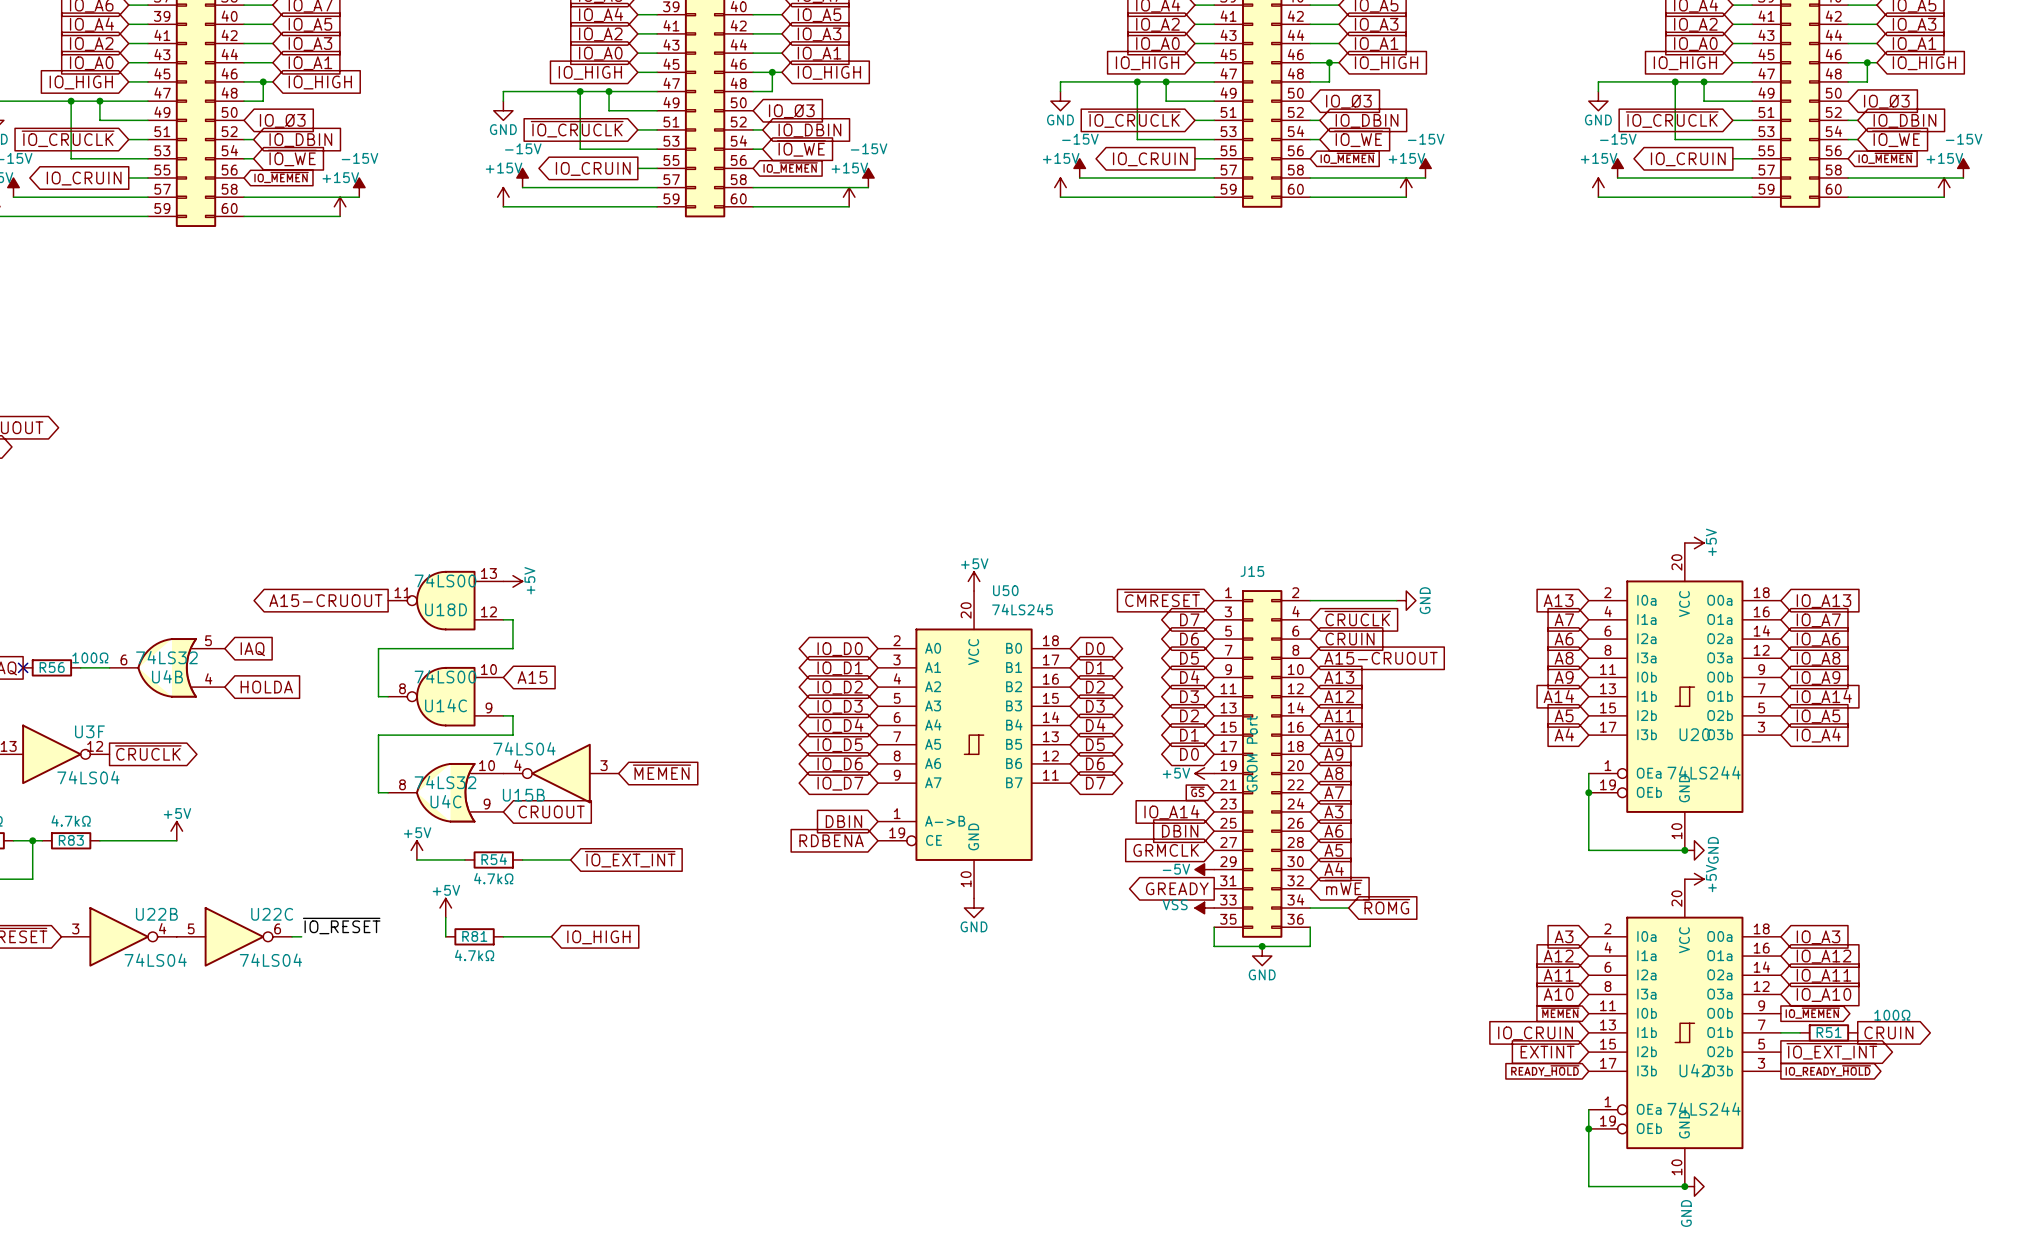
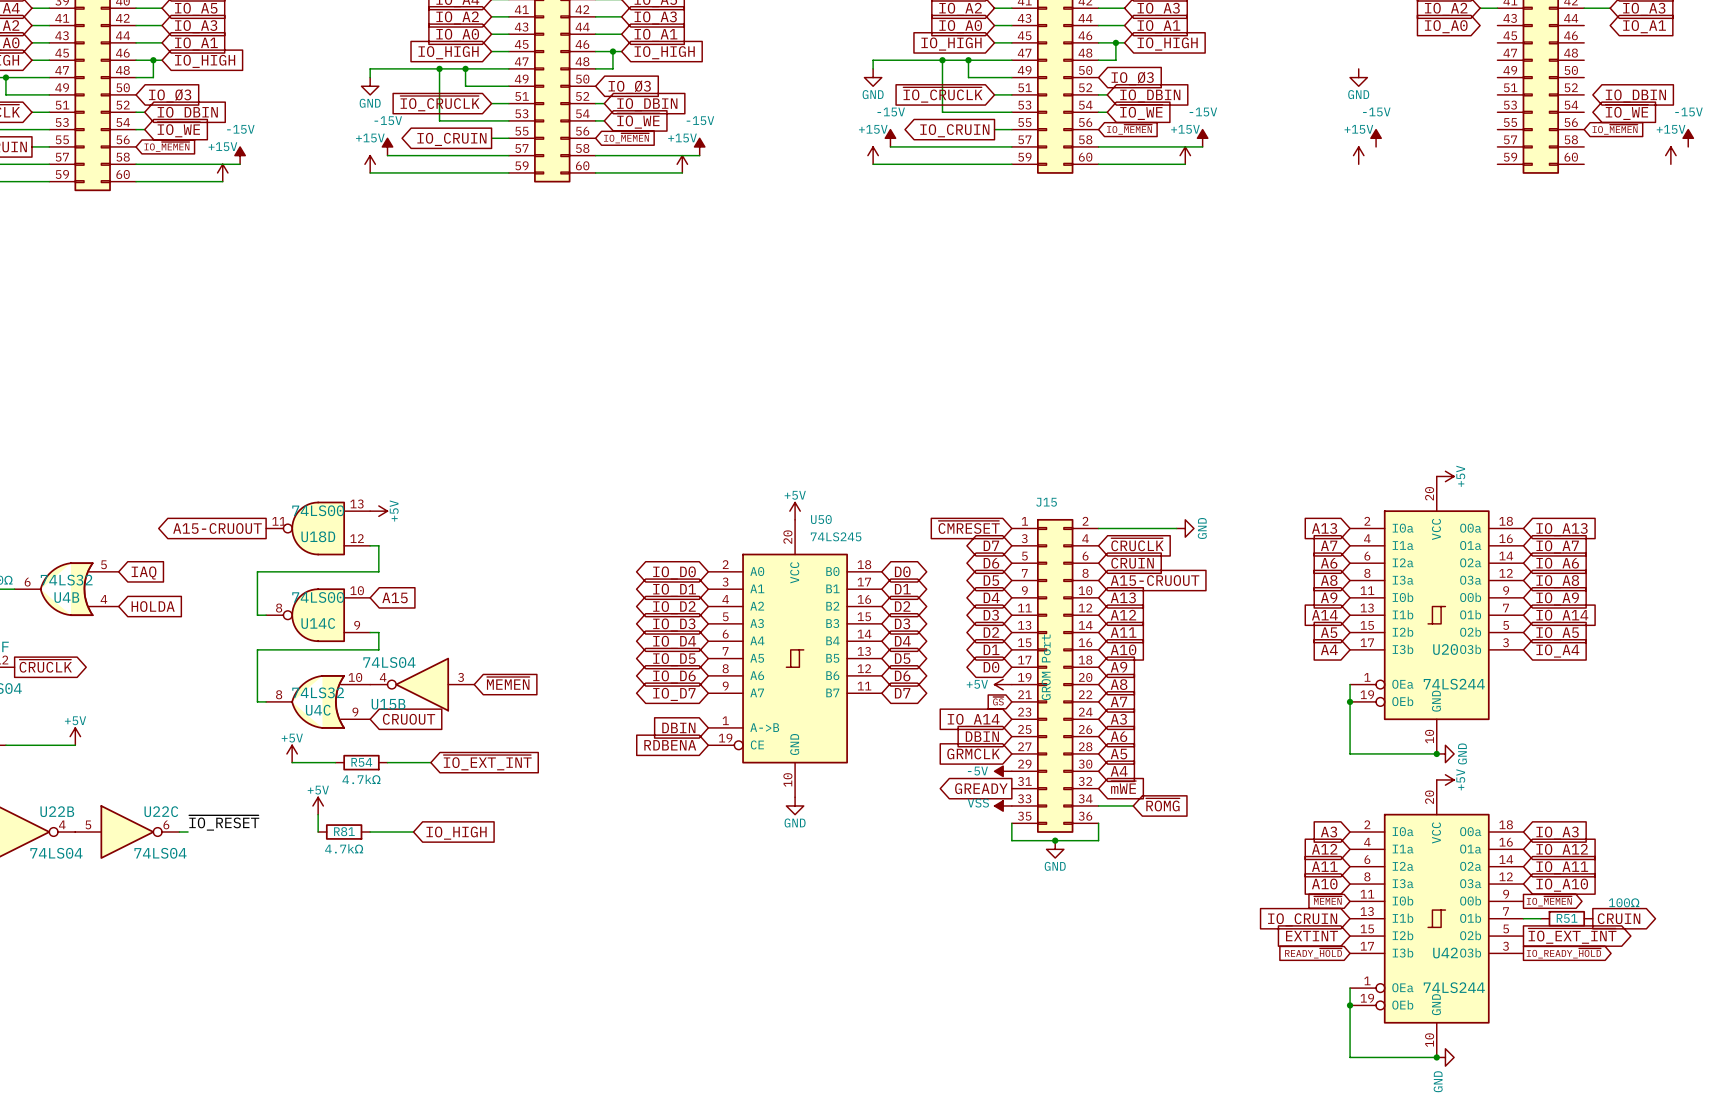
wire: (1732, 43) (1752, 43) -> none
wire: (1848, 43) (1876, 43) -> none
wire: (1732, 62) (1752, 62) -> none
wire: (1848, 62) (1876, 62) -> none
wire: (1867, 62) (1867, 81) (1848, 81) -> none
junction: (1867, 62) -> none
global label: IO_HIGH (1685, 63) -> none
global label: IO_HIGH (1924, 63) -> none
wire: (1675, 81) (1675, 139) (1752, 139) -> none
junction: (1675, 81) -> none
wire: (1704, 81) (1704, 101) (1752, 101) -> none
junction: (1704, 81) -> none
wire: (1752, 81) (1598, 81) (1598, 91) -> none
global label: IO_Ø3 (1886, 101) -> none
global label: ~{IO_CRUCLK} (1672, 119) -> none
wire: (1732, 120) (1752, 120) -> none
wire: (1848, 120) (1857, 120) -> none
wire: (1848, 139) (1857, 139) -> none
wire: (1732, 158) (1752, 158) -> none
global label: IO_CRUIN (1688, 159) -> none
wire: (1617, 177) (1752, 177) -> none
wire: (1848, 177) (1963, 177) -> none
wire: (1598, 197) (1752, 197) -> none
wire: (1848, 197) (1944, 197) -> none

